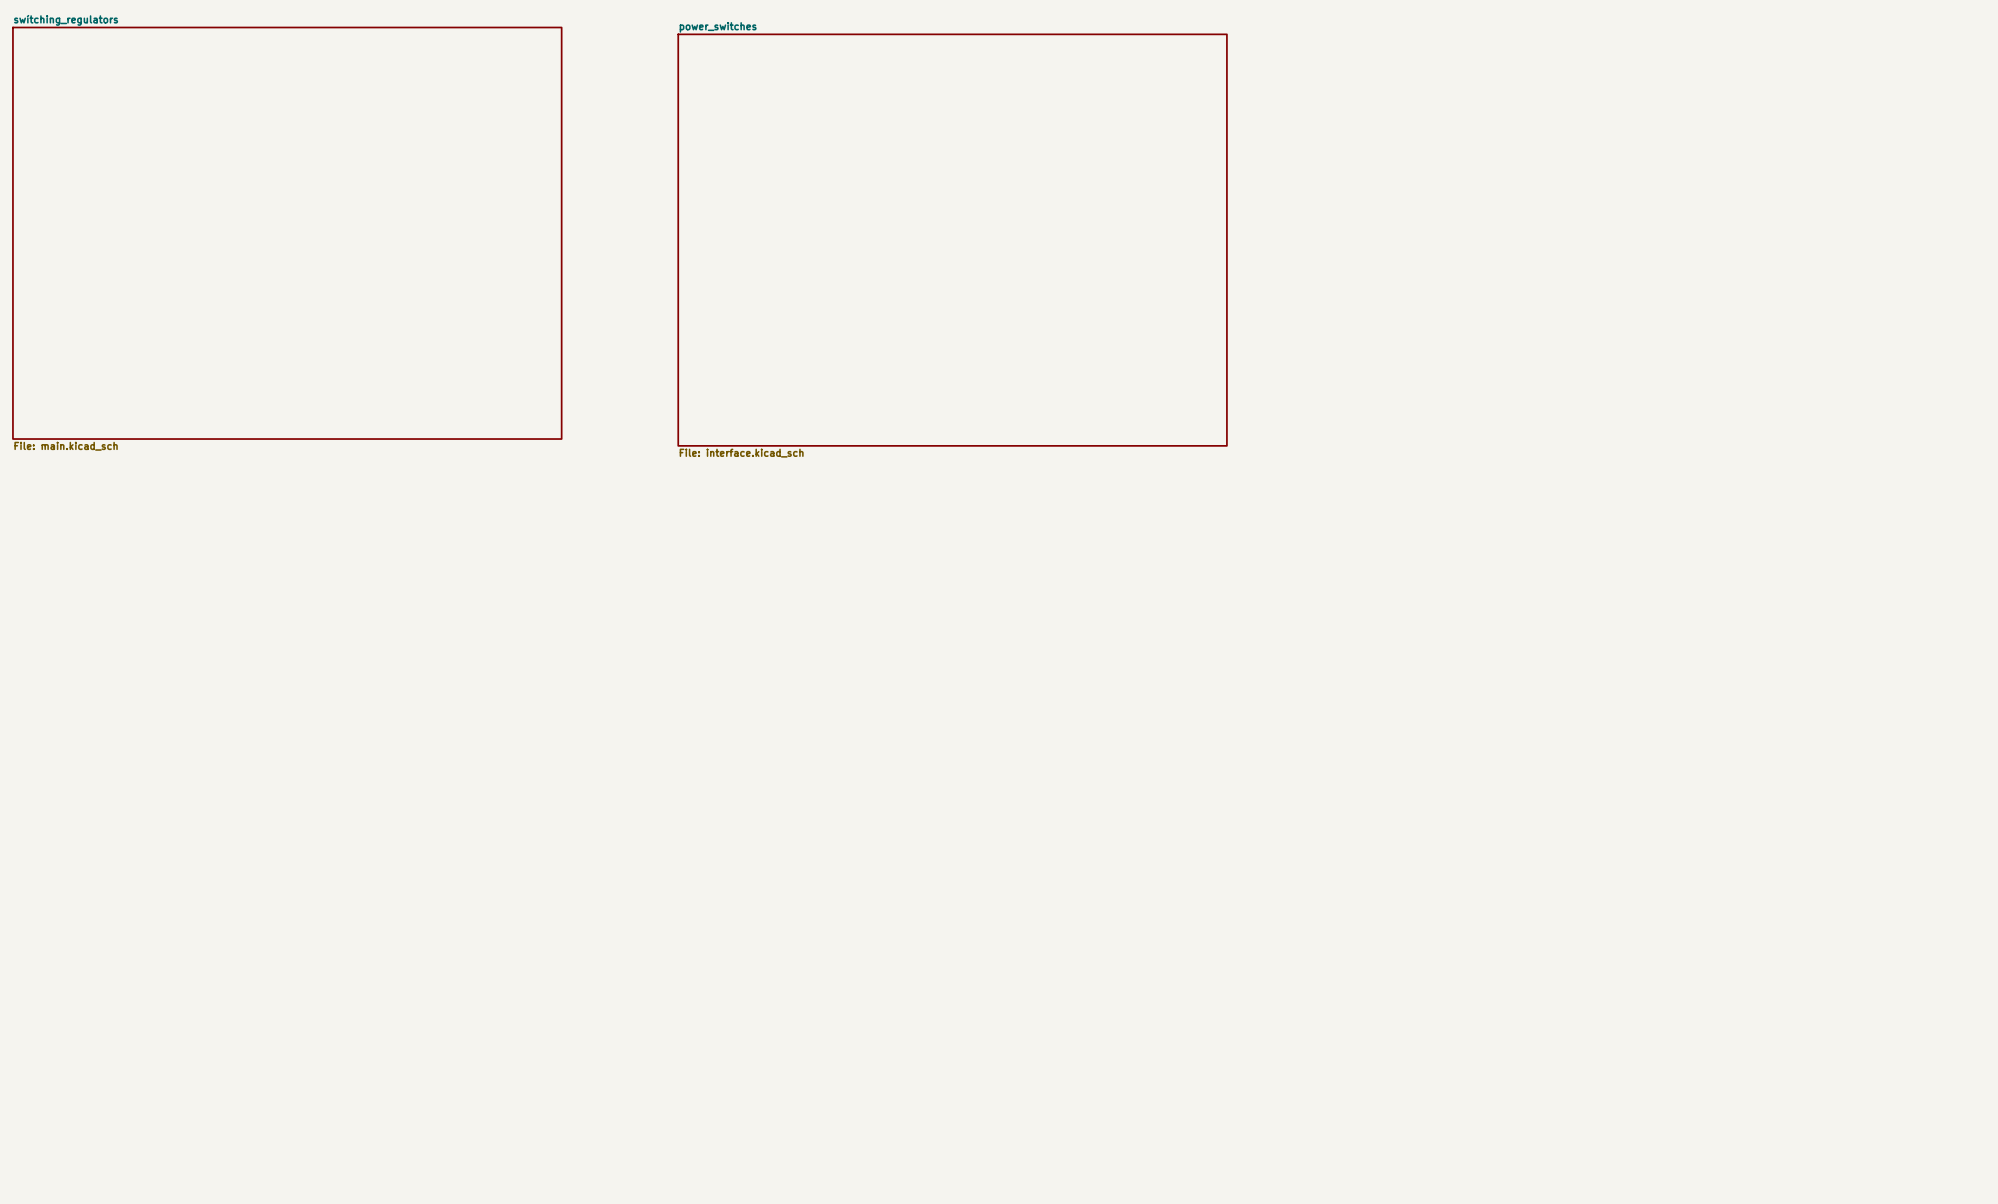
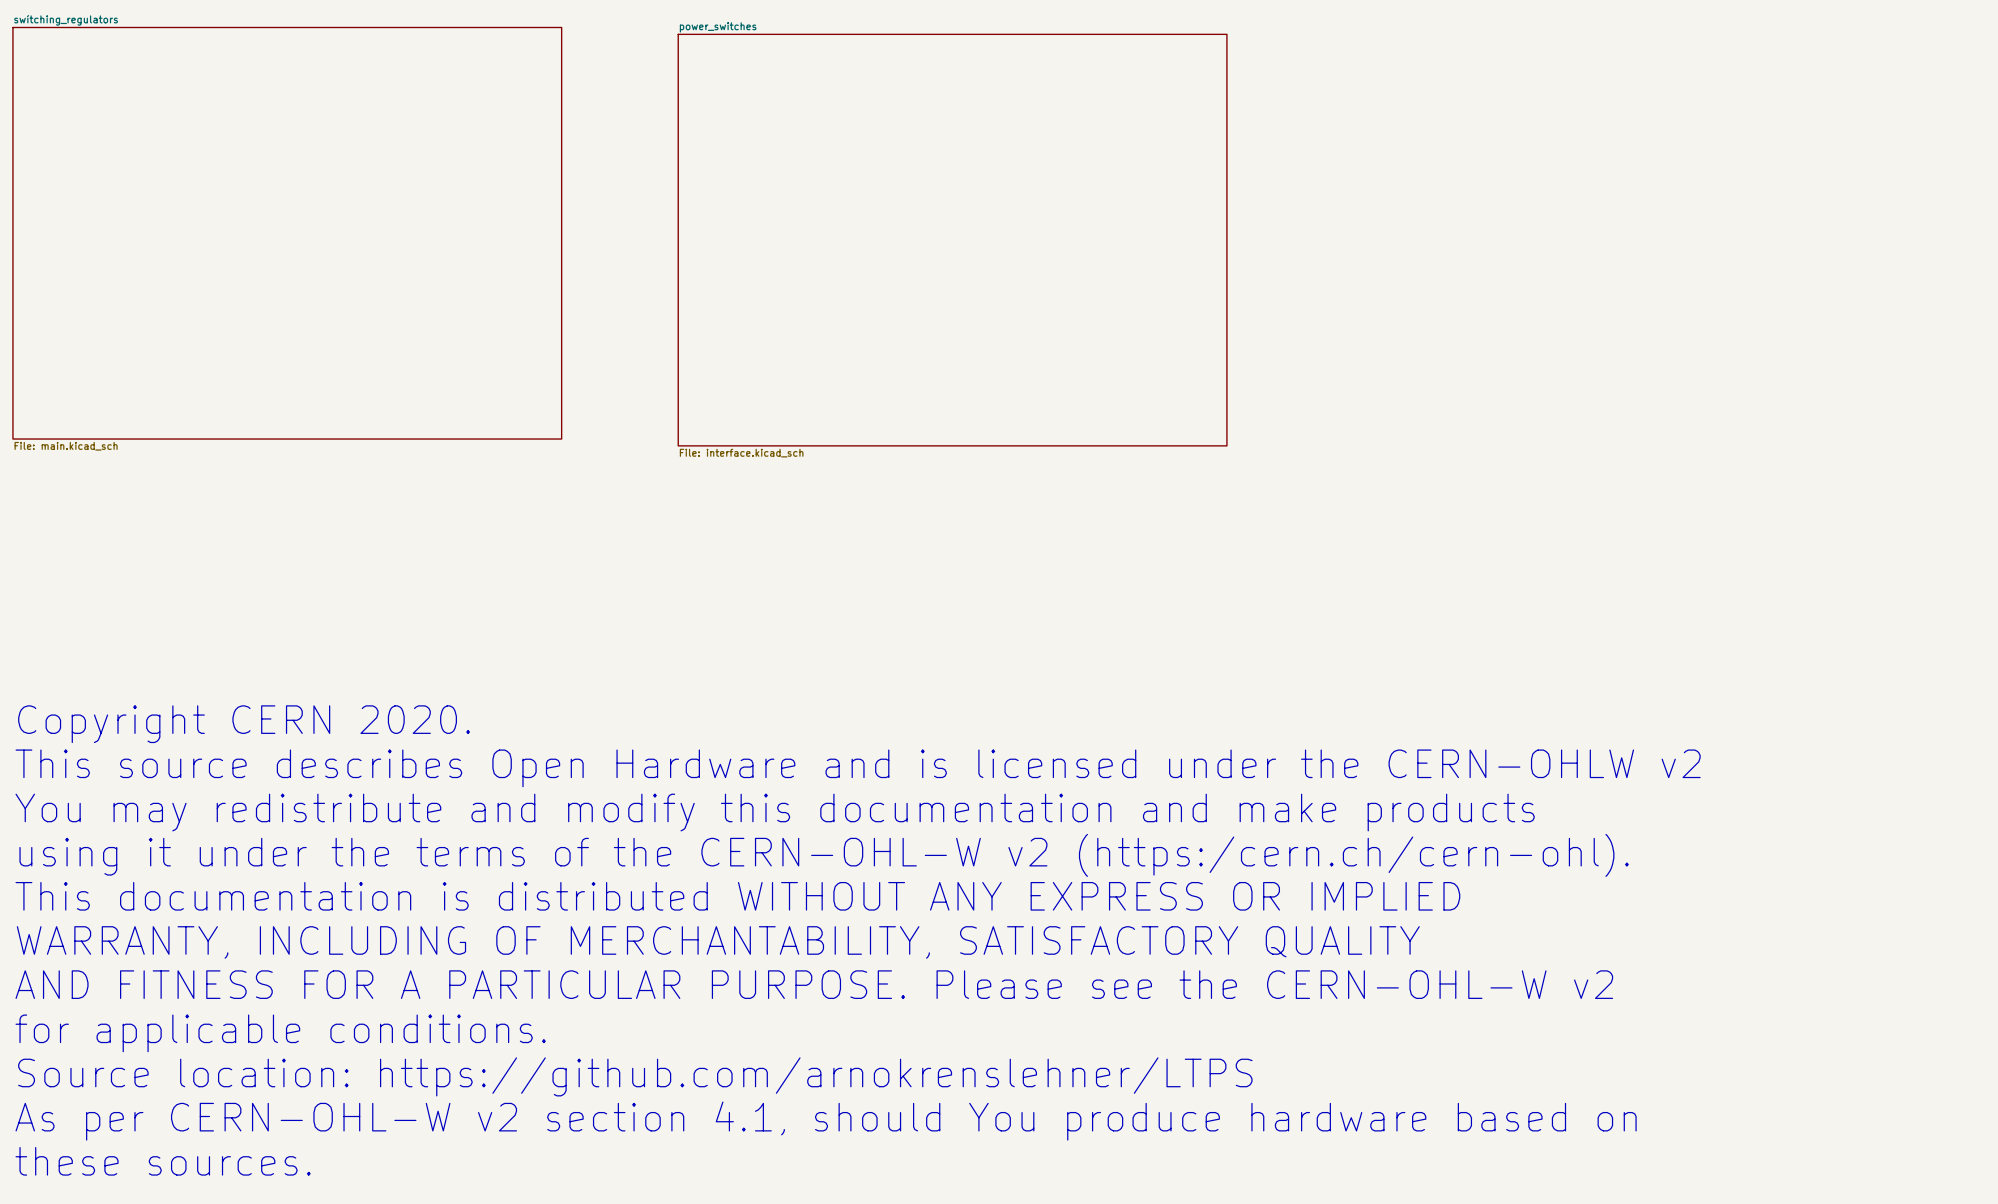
text: none -> Copyright CERN 2020. (244, 724)
text: none -> This source describes Open Hardware and is licensed under the CERN-OHLW v2 (858, 768)
text: none -> You may redistribute and modify this documentation and make products (775, 812)
text: none -> using it under the terms of the CERN-OHL-W v2 (https:/cern.ch/cern-ohl). (824, 855)
text: none -> This documentation is distributed WITHOUT ANY EXPRESS OR IMPLIED (737, 896)
text: none -> WARRANTY, INCLUDING OF MERCHANTABILITY, SATISFACTORY QUALITY (718, 942)
text: none -> AND FITNESS FOR A PARTICULAR PURPOSE. Please see the CERN-OHL-W v2 (814, 984)
text: none -> for applicable conditions. (280, 1033)
text: none -> Source location: https://github.com/arnokrenslehner/LTPS (635, 1076)
text: none -> As per CERN-OHL-W v2 section 4.1, should You produce hardware based on (826, 1121)
text: none -> these sources. (163, 1161)

